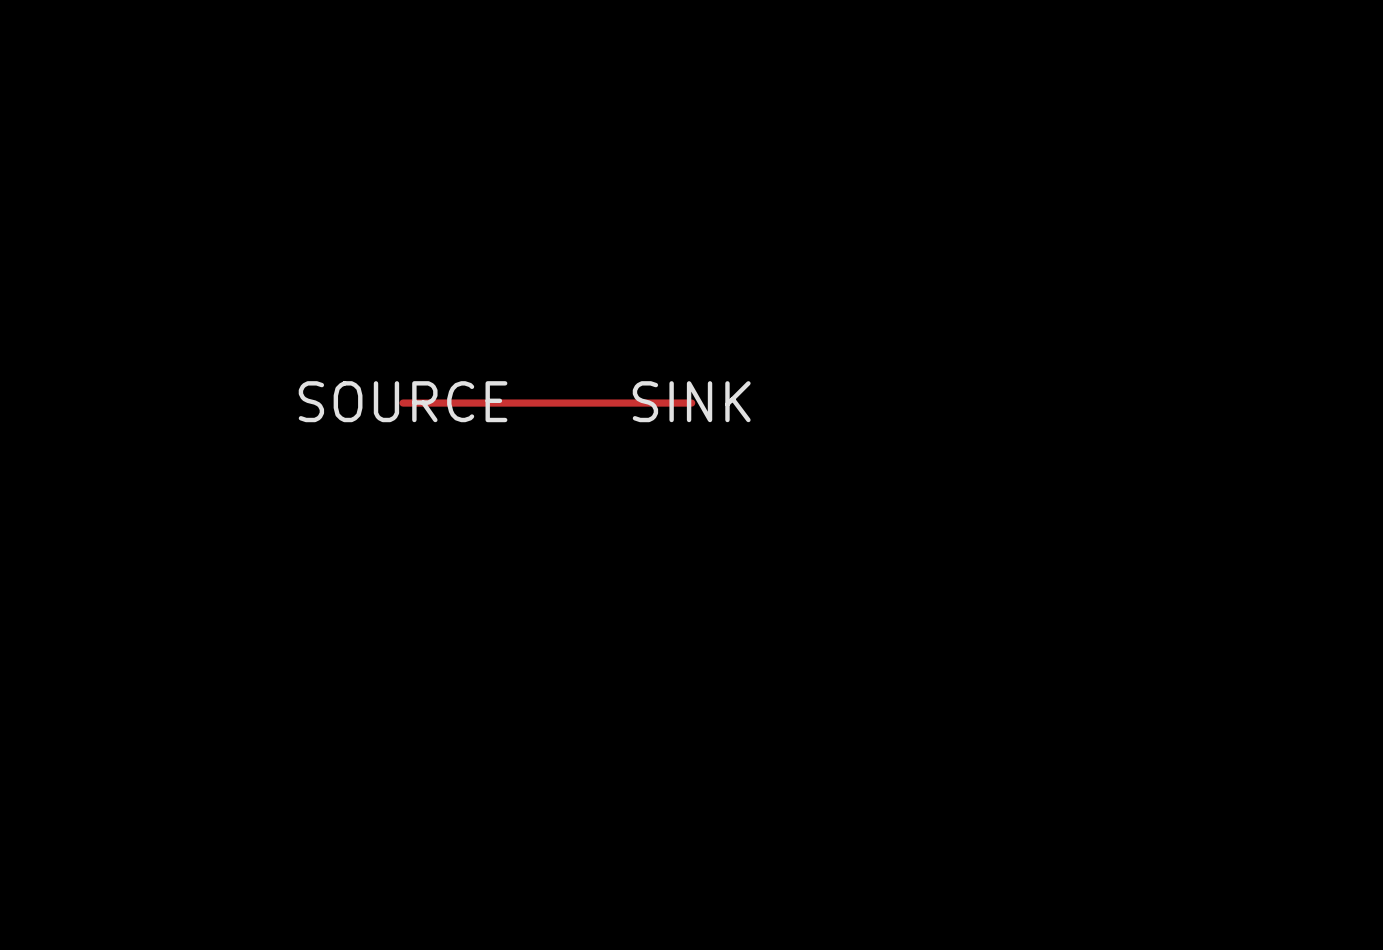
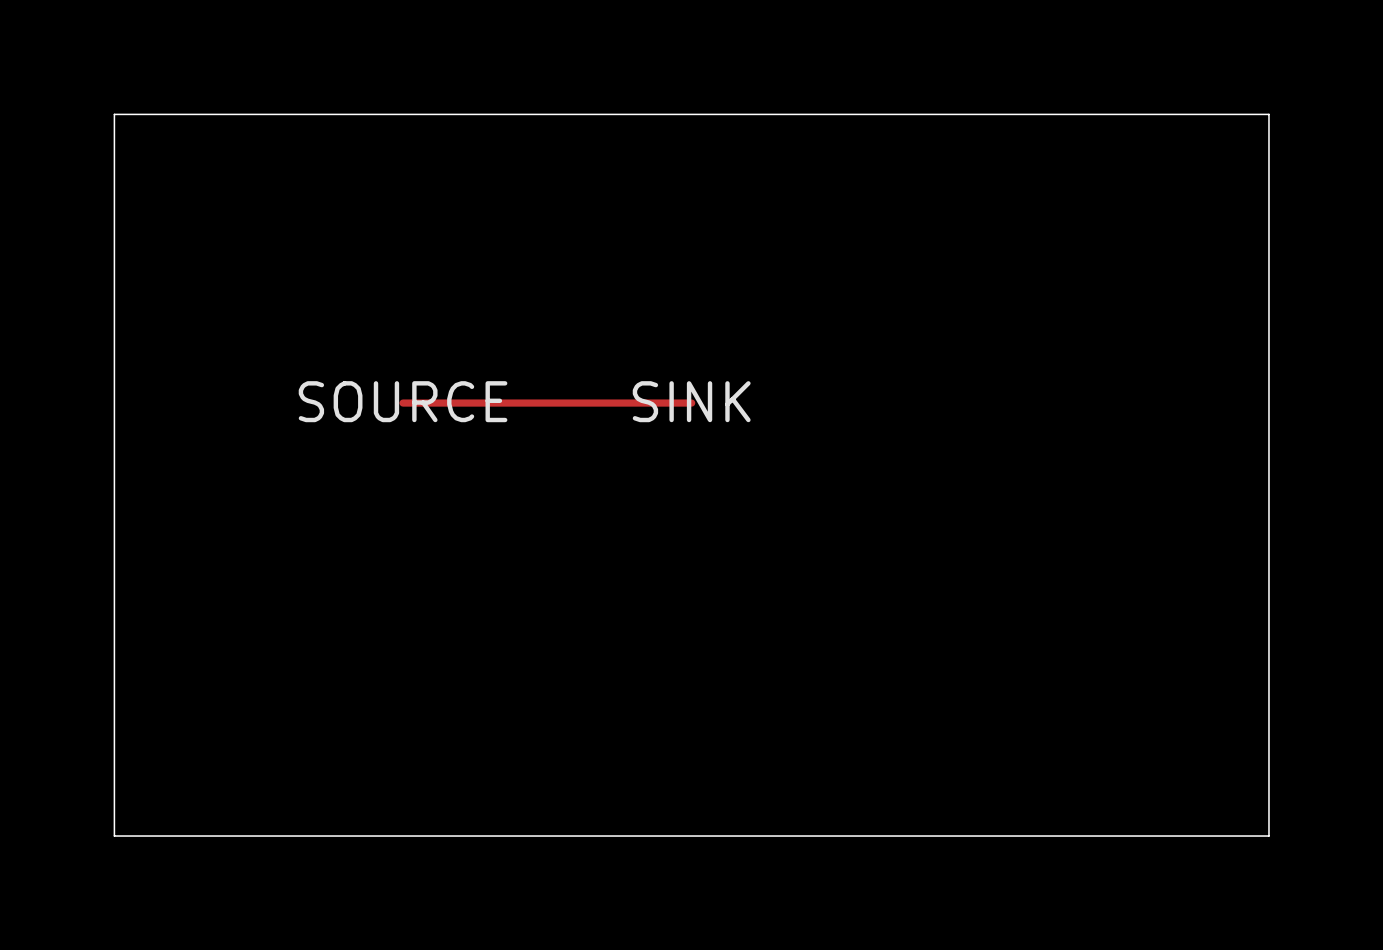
board edge: none -> (114, 114) (1268, 114) (1268, 836) (114, 836) (114, 114)

